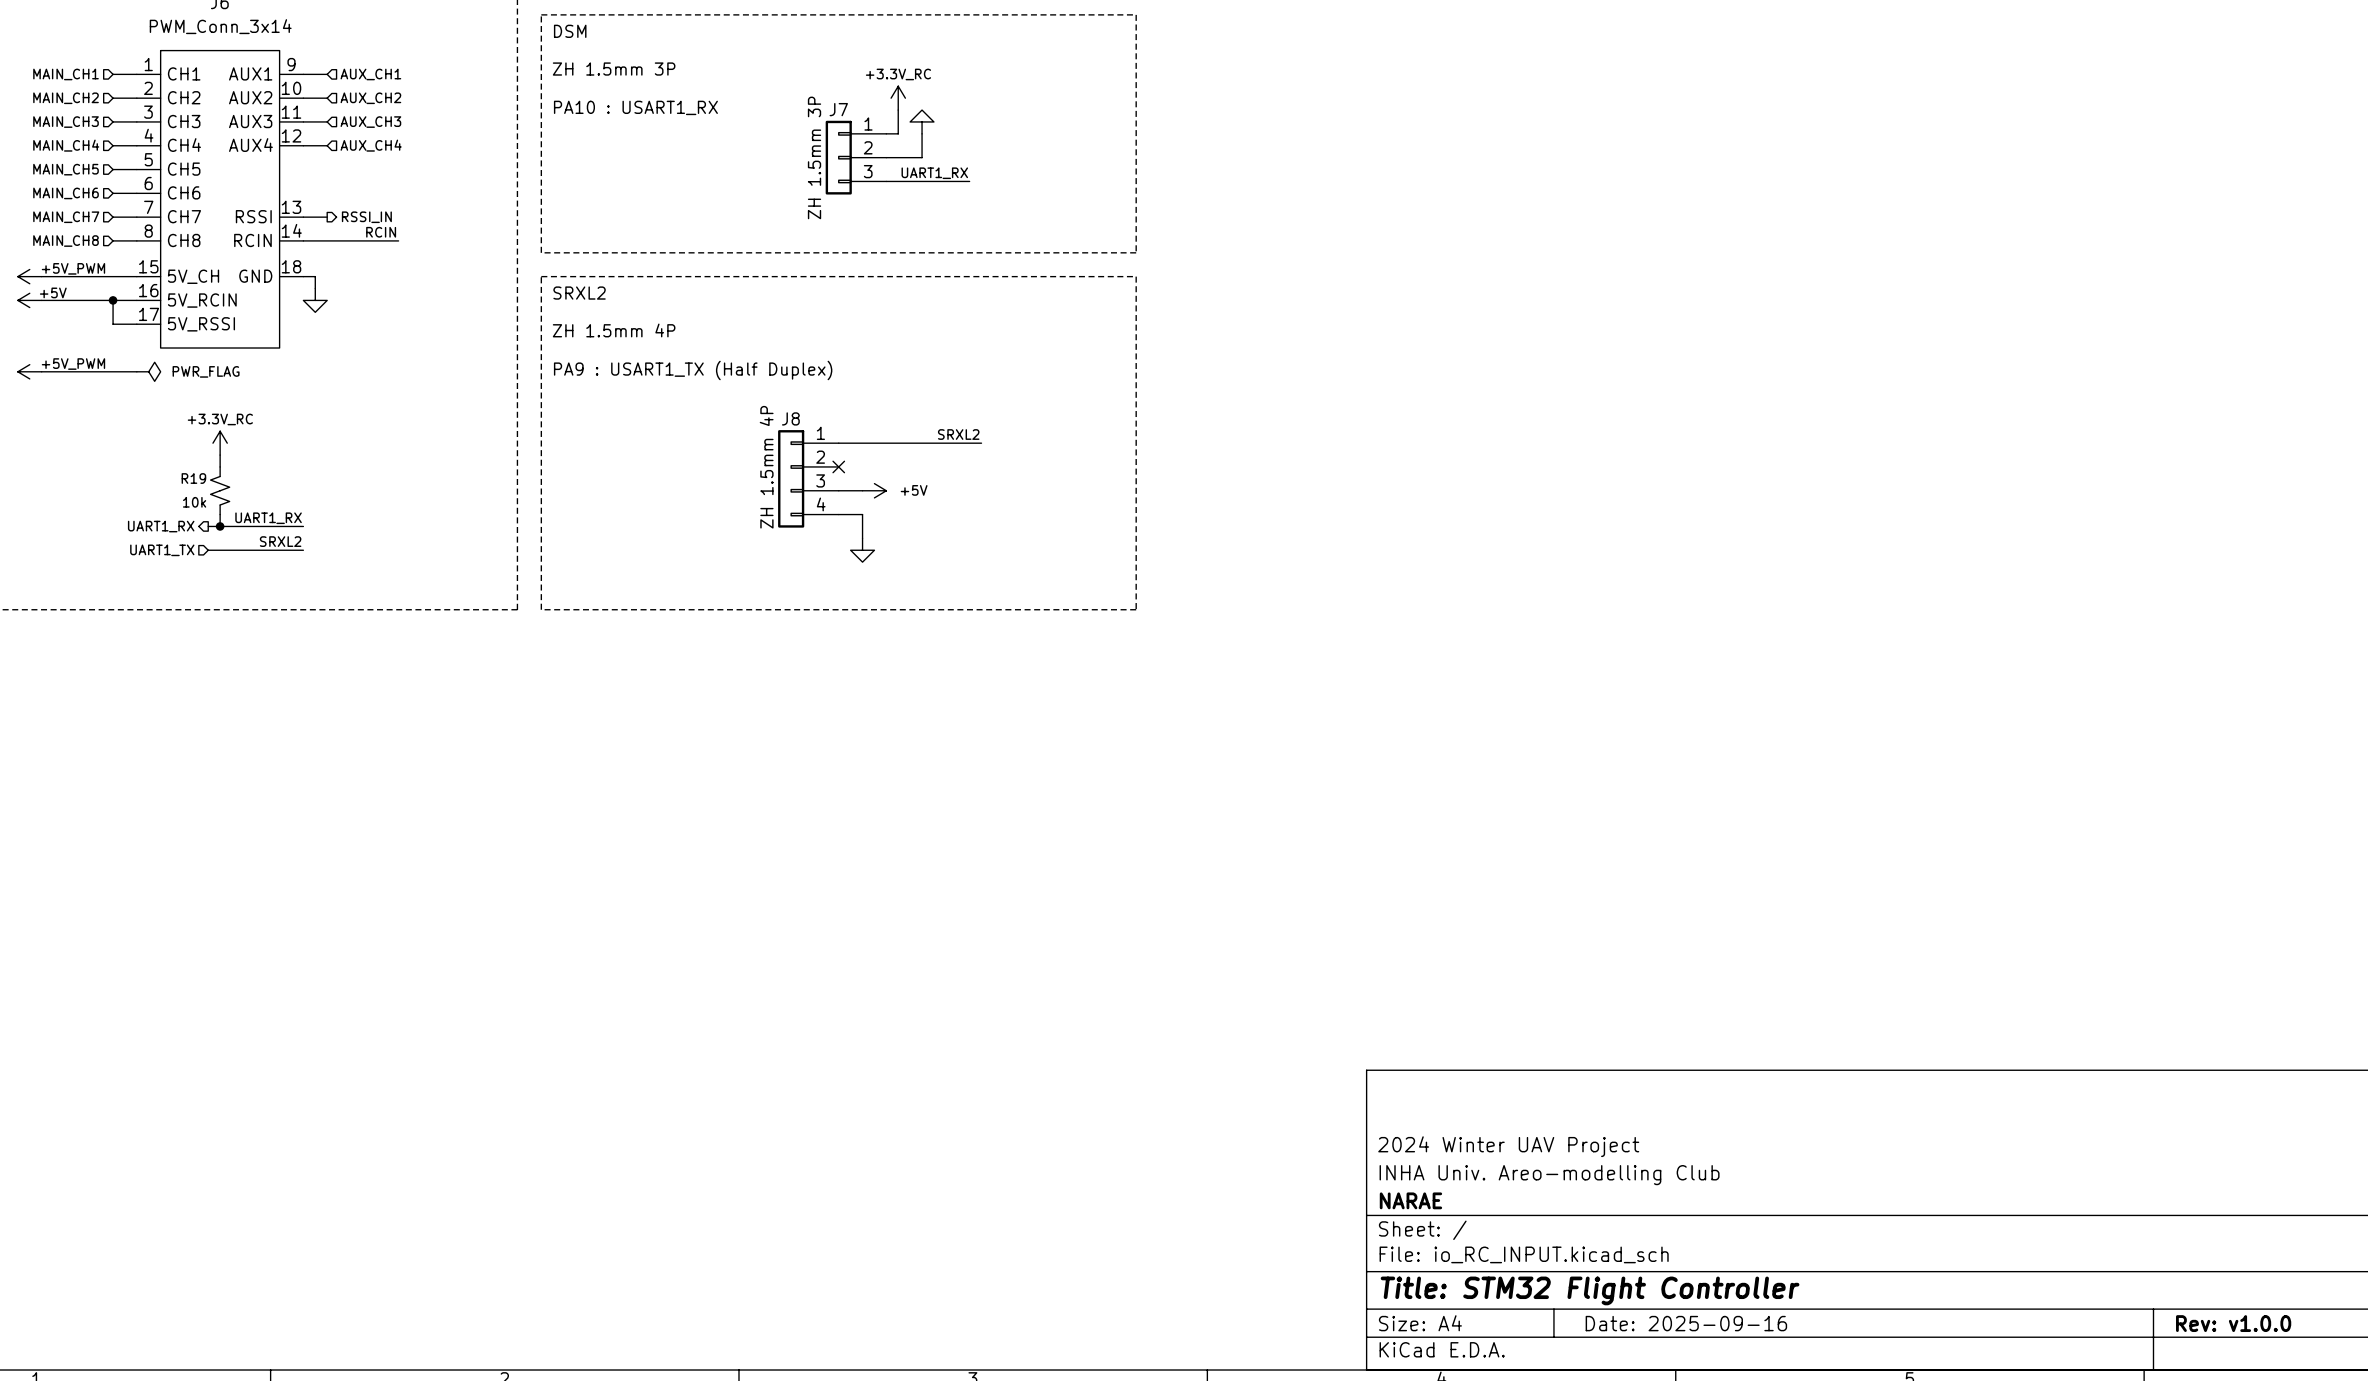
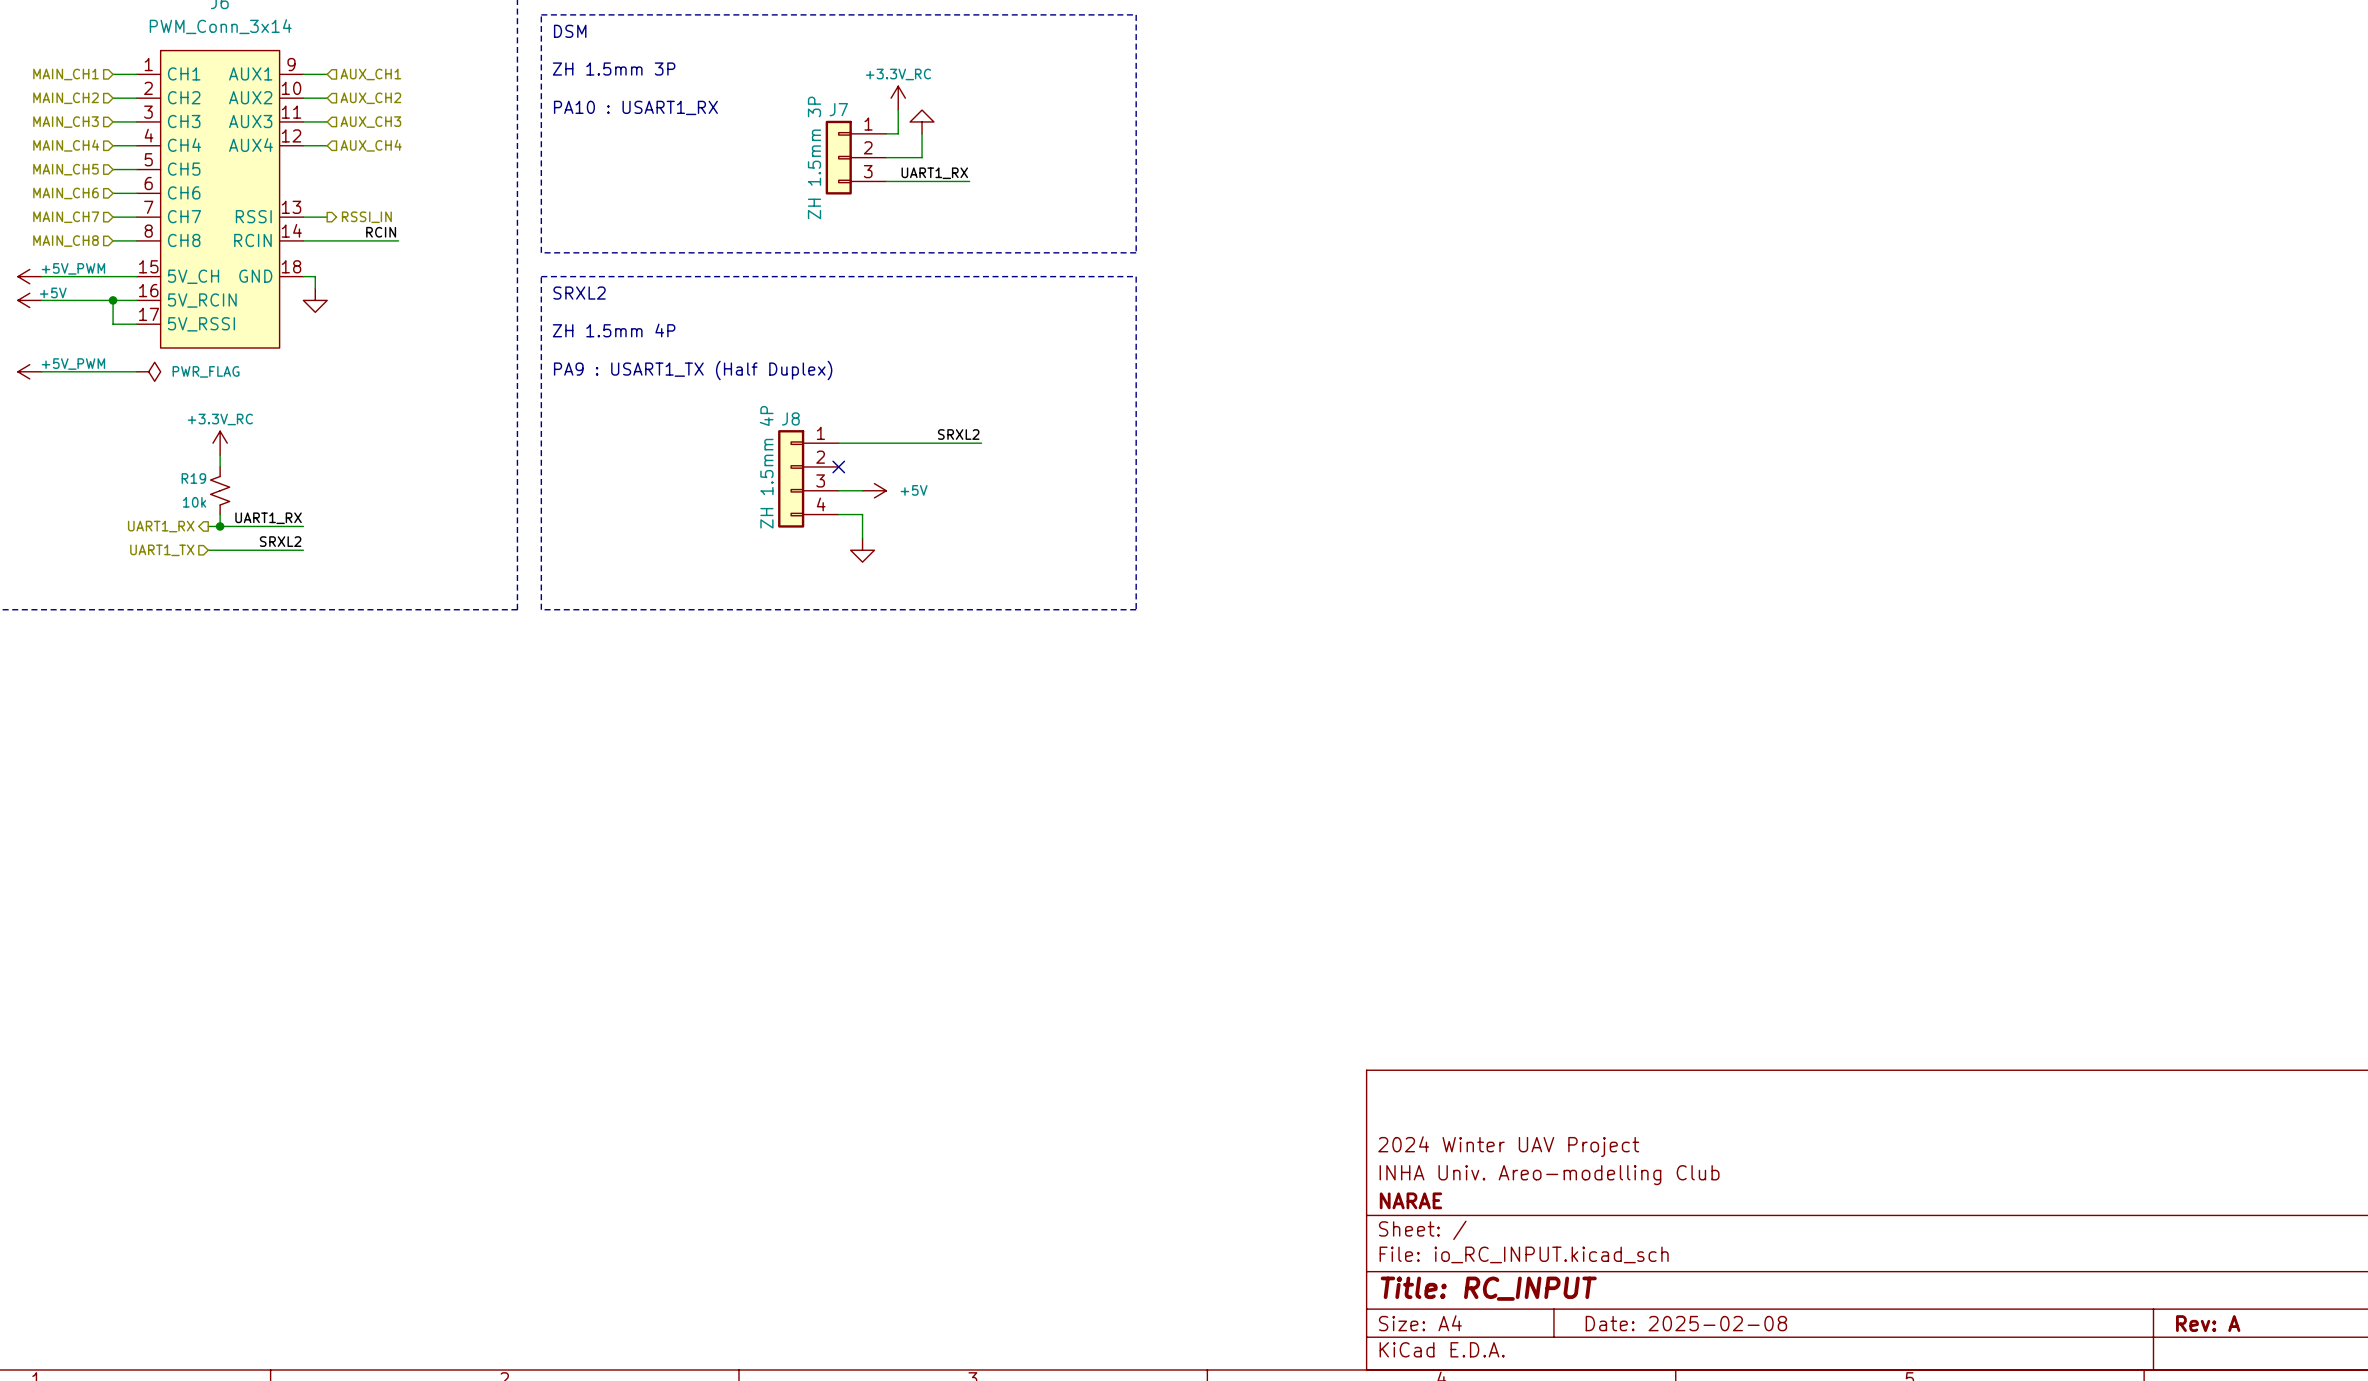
title block: Title: STM32 Flight Controller (1590, 1290) -> Title: RC_INPUT (1488, 1288)
title block: Date: 2025-09-16 (1686, 1323) -> Date: 2025-02-08 (1686, 1323)
title block: Rev: v1.0.0 (2233, 1323) -> Rev: A (2208, 1323)

